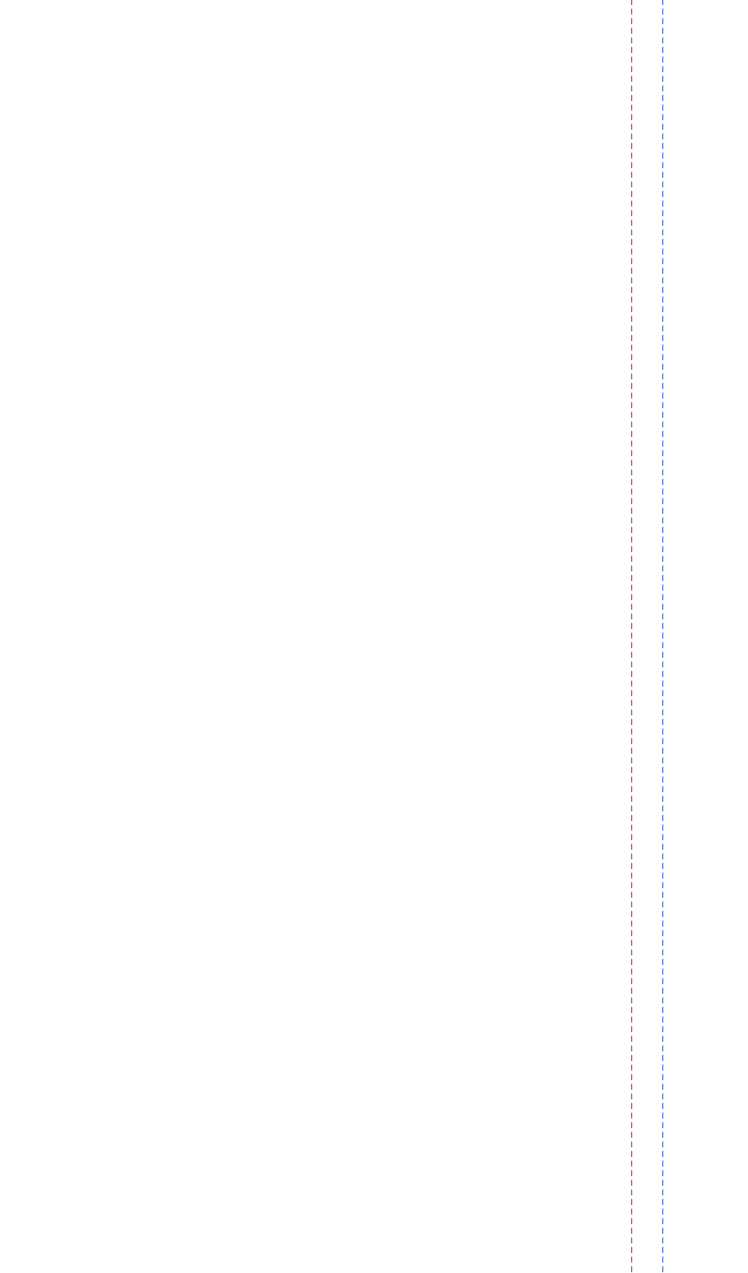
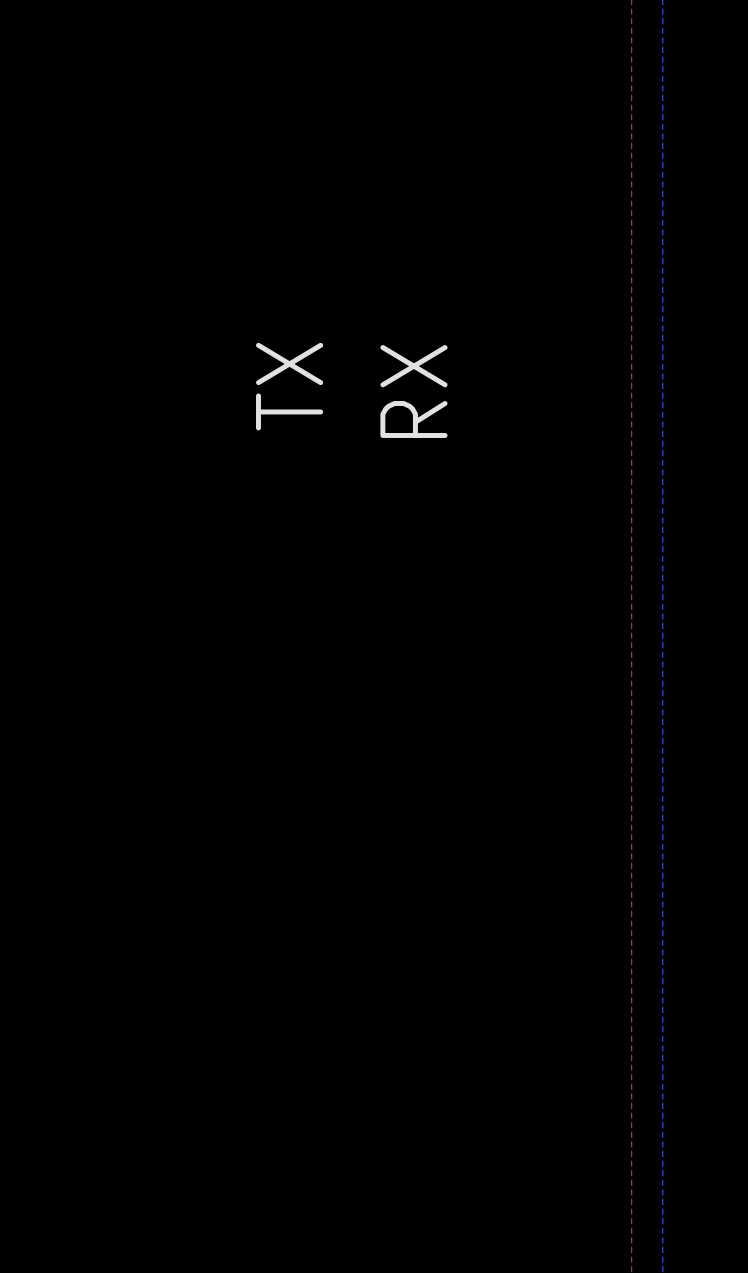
text: none -> TX (289, 386)
text: none -> RX (413, 391)

